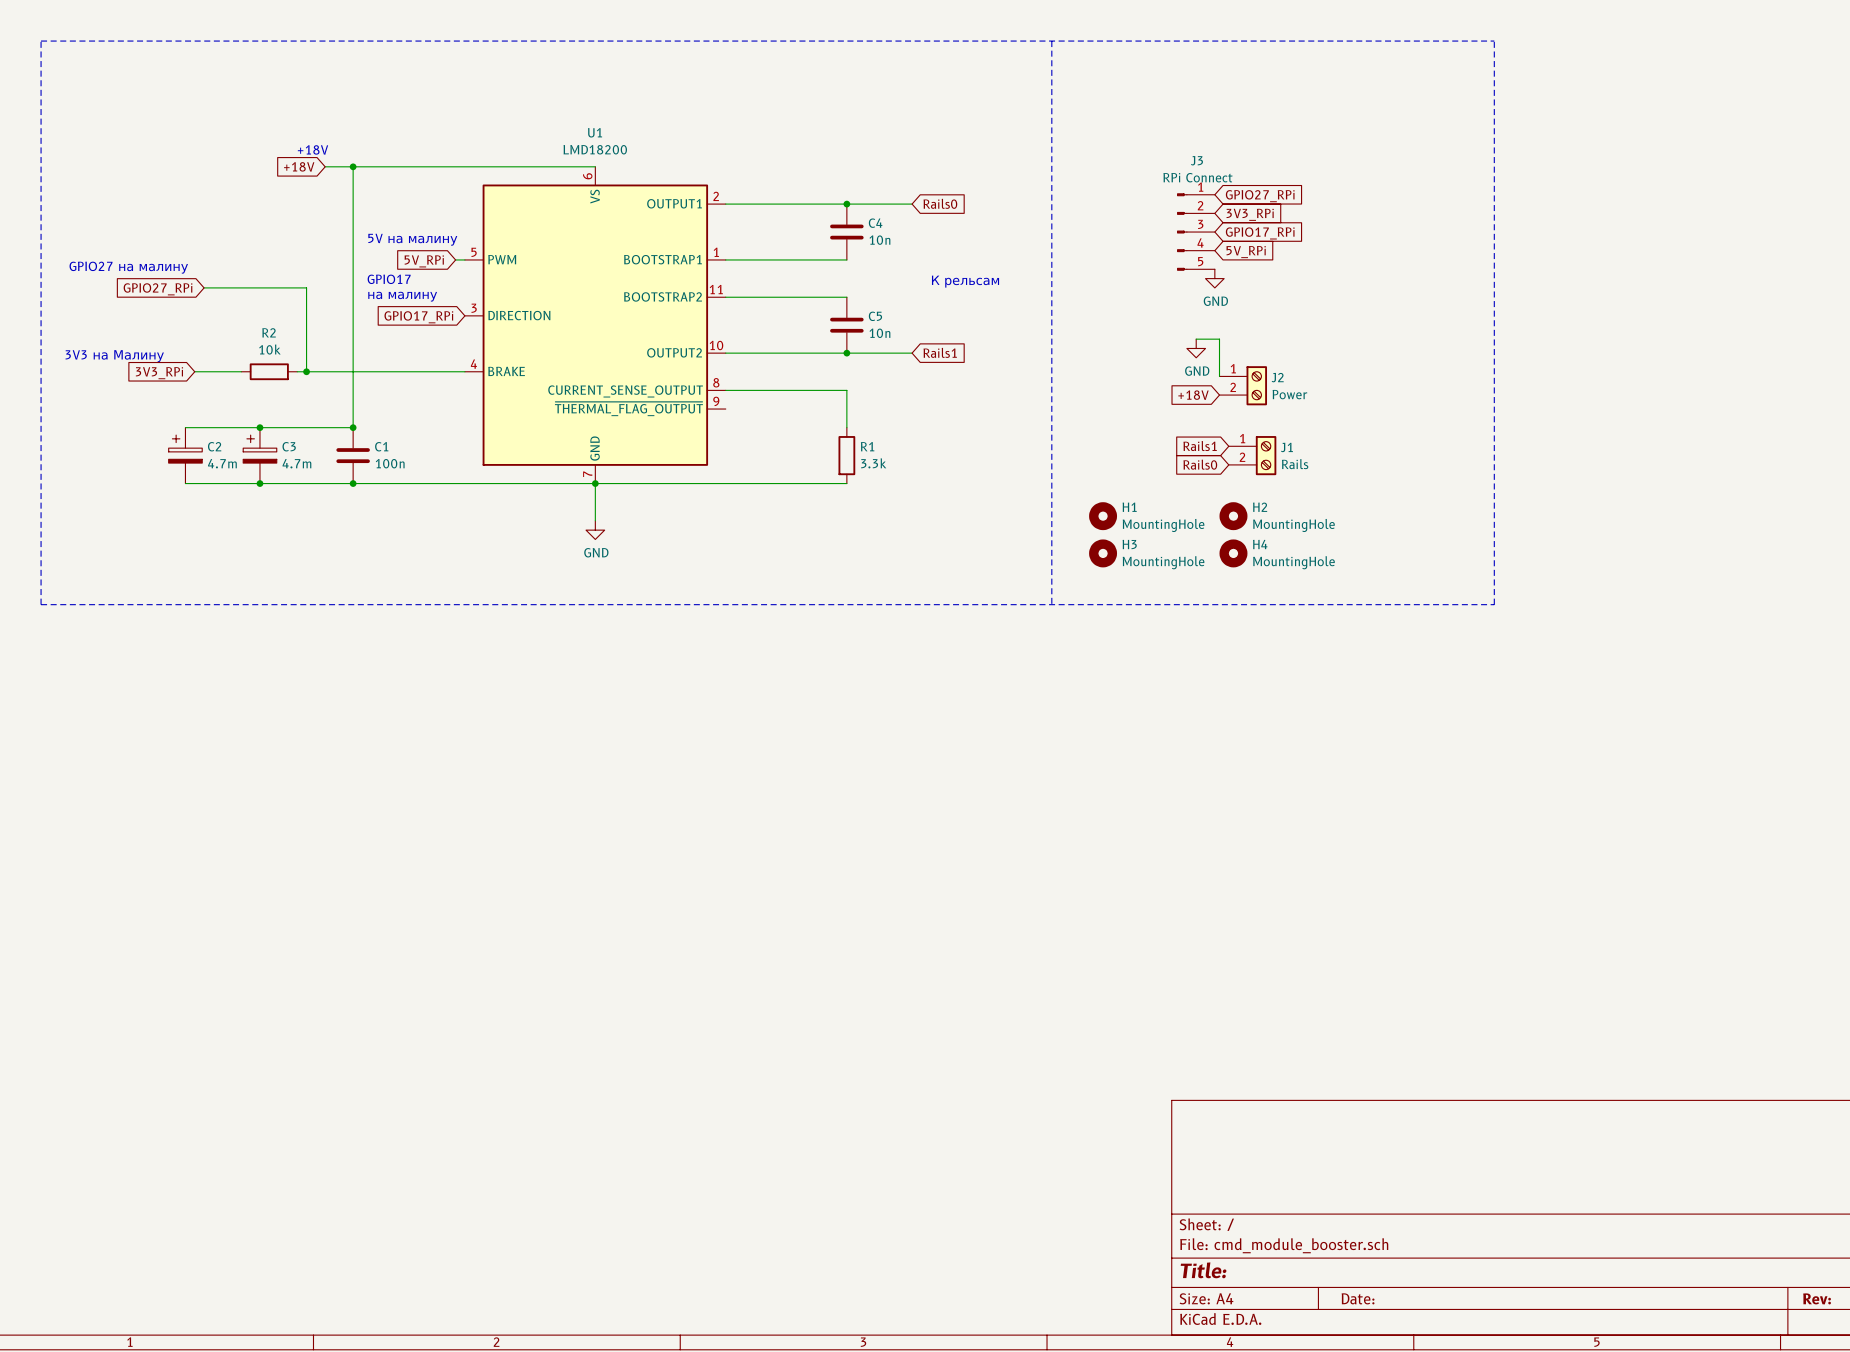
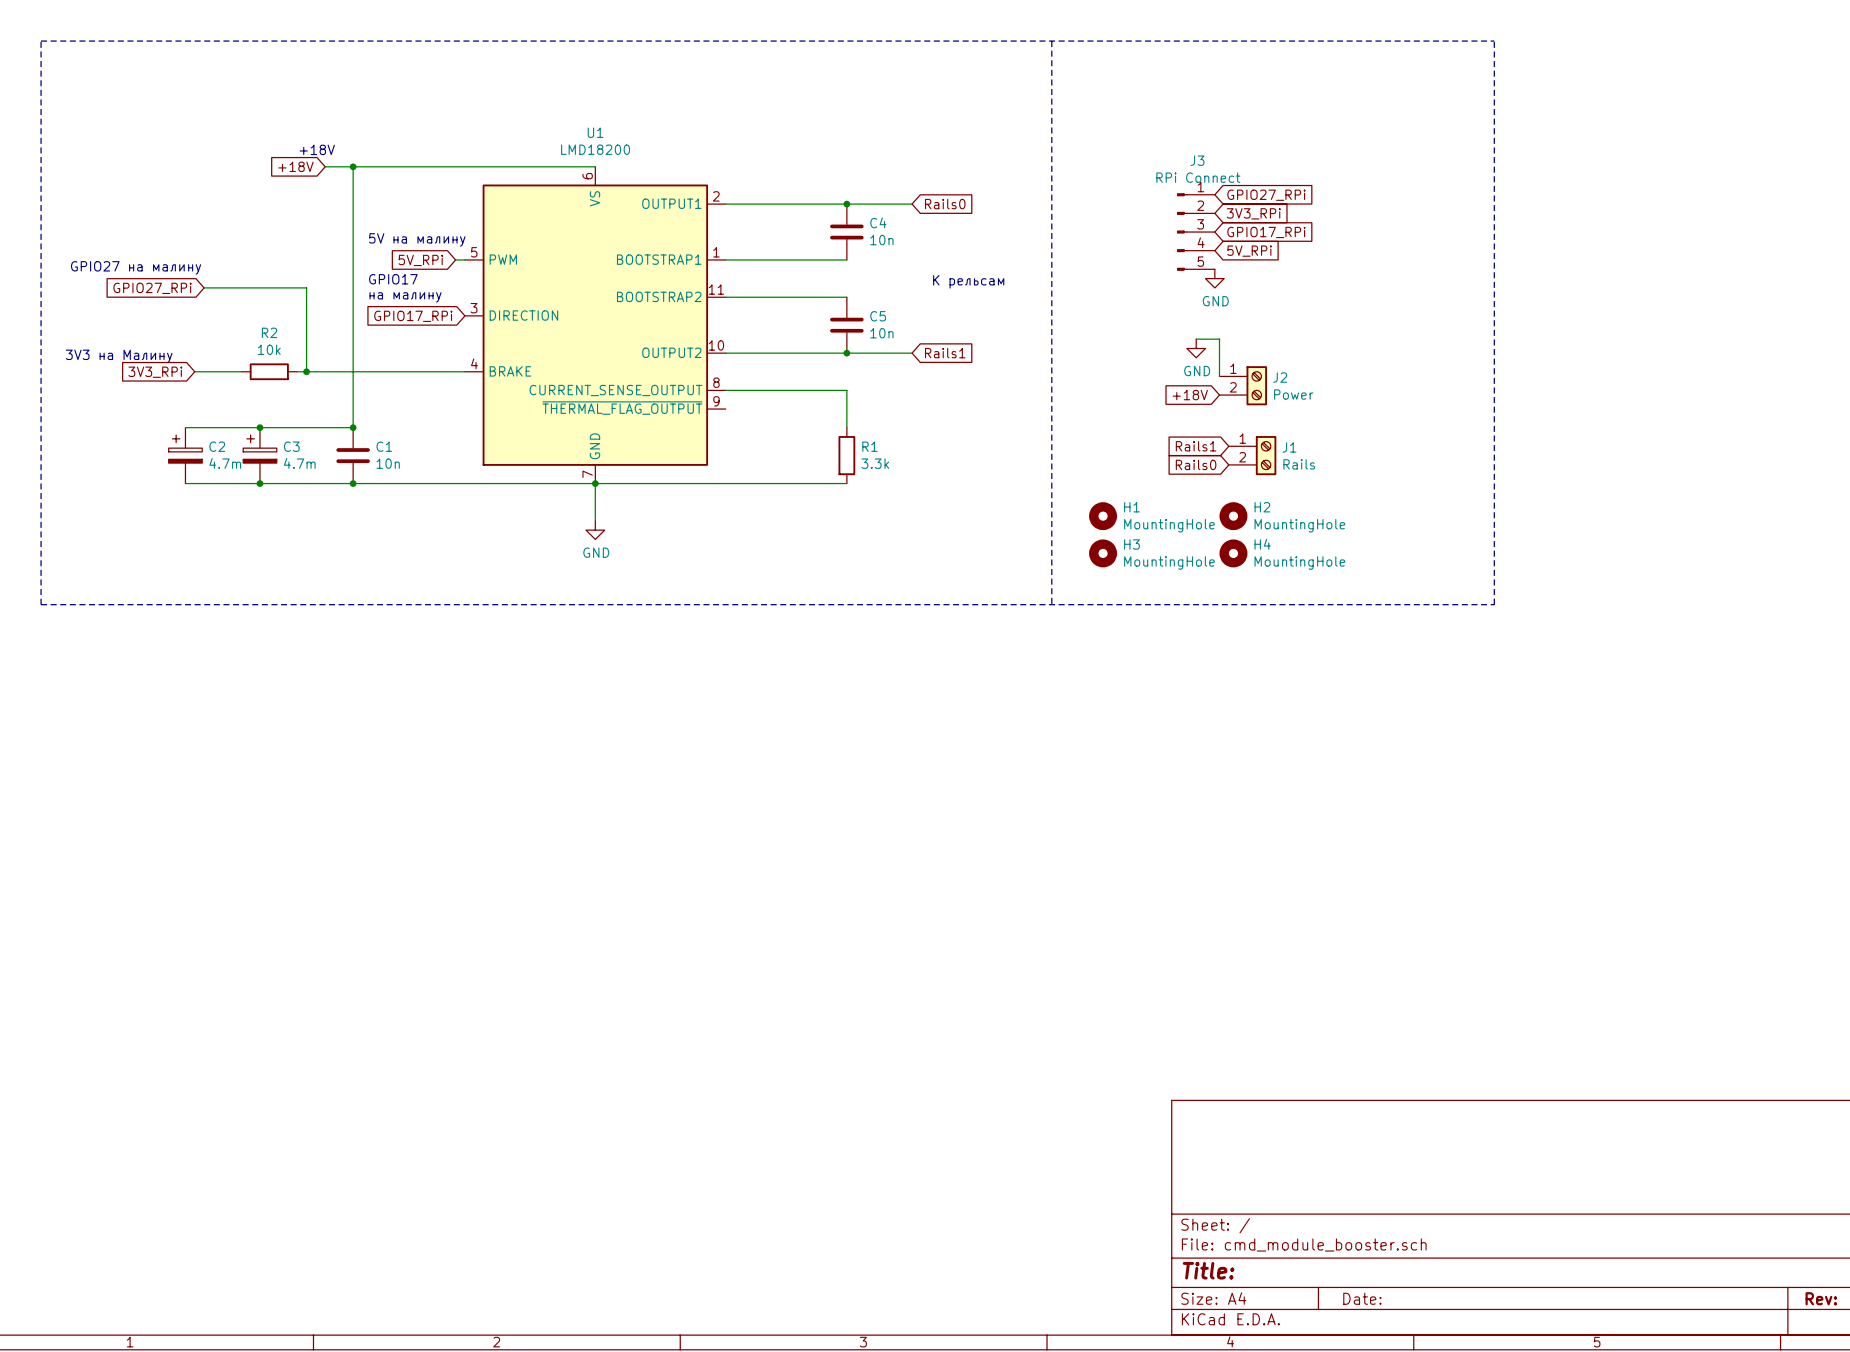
C1 value: 100n (390, 463) -> 10n (388, 463)

